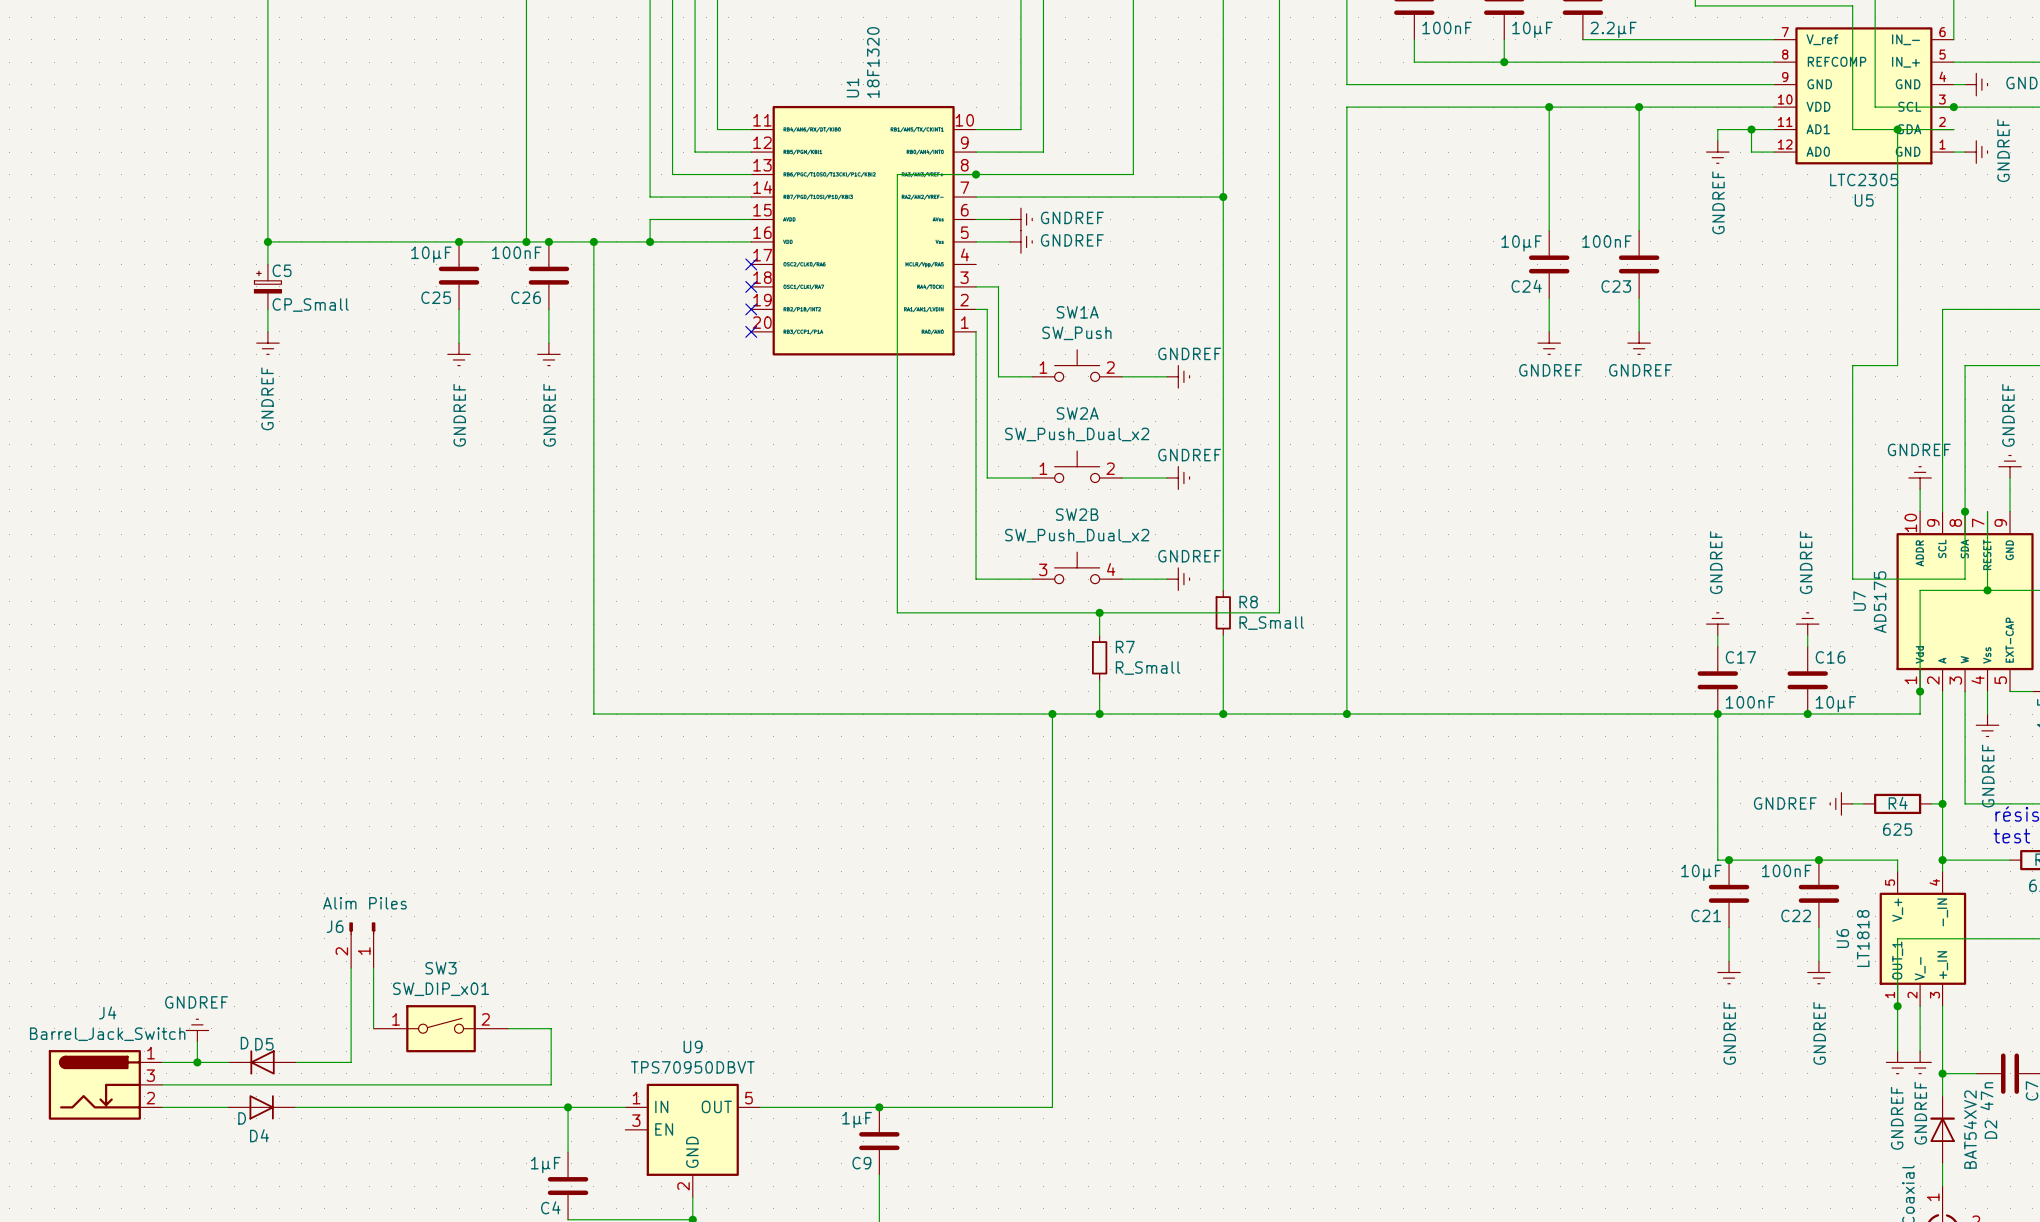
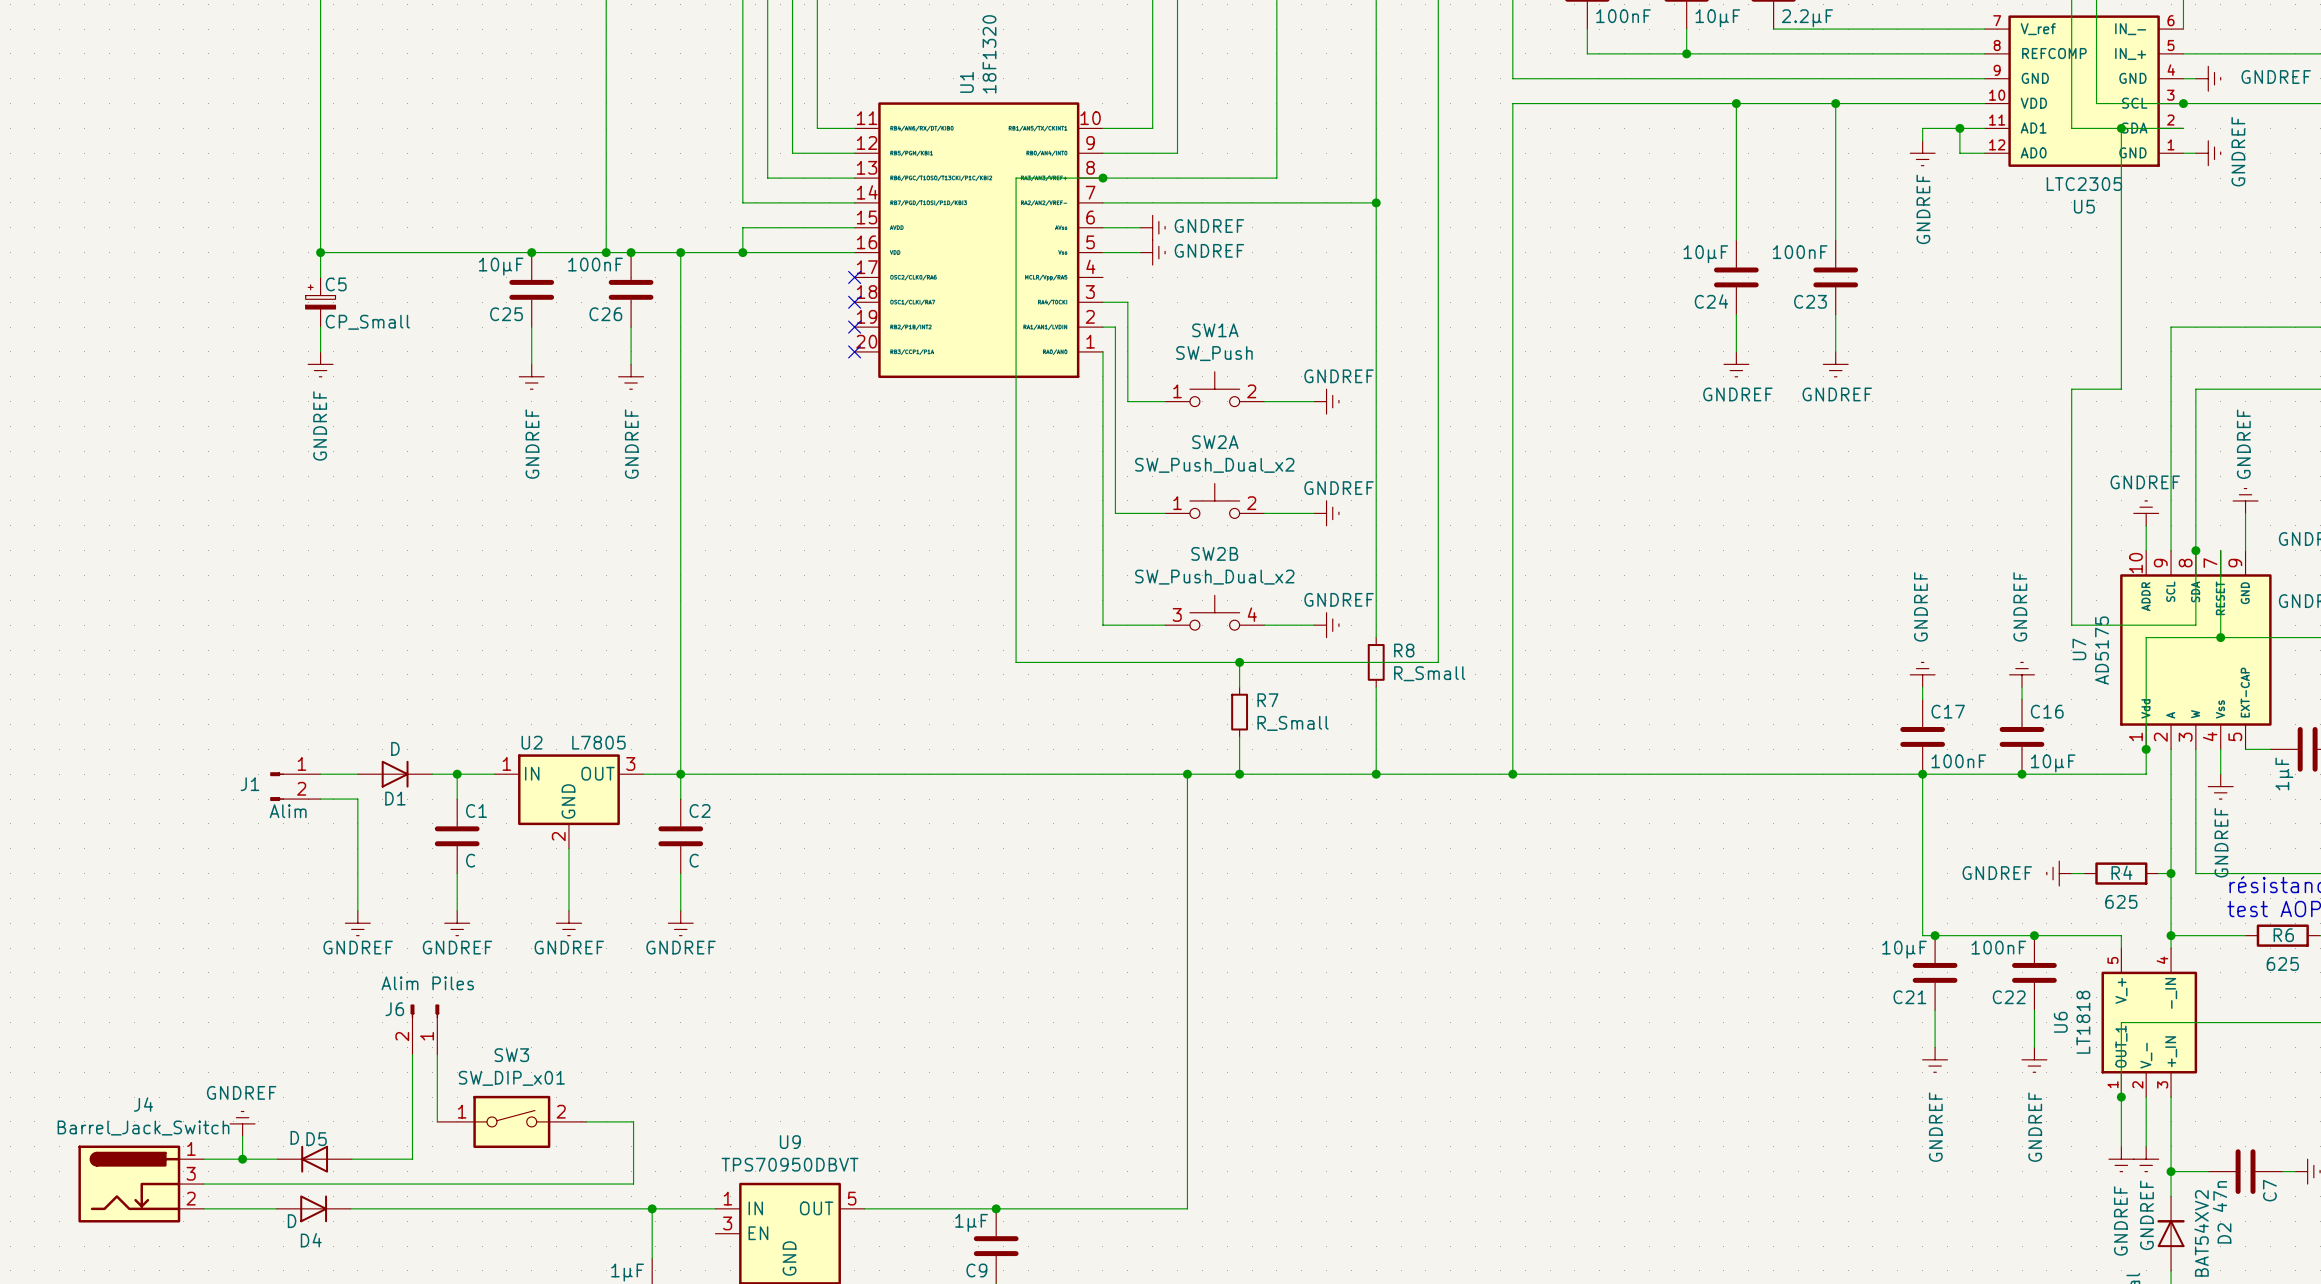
wire: none -> (320, 774) (357, 774)
D1: none -> D (395, 774)
wire: none -> (432, 774) (494, 774)
wire: none -> (457, 774) (457, 799)
junction: none -> (457, 774)
wire: none -> (643, 774) (680, 774) (680, 799)
junction: none -> (680, 774)
J1: none -> Alim (295, 786)
wire: none -> (320, 799) (357, 799) (357, 910)
U2: none -> L7805 (568, 801)
C1: none -> C (457, 836)
C2: none -> C (680, 836)
wire: none -> (568, 848) (568, 910)
wire: none -> (457, 873) (457, 910)
wire: none -> (680, 873) (680, 910)
power symbol: none -> GNDREF (357, 923)
power symbol: none -> GNDREF (457, 923)
power symbol: none -> GNDREF (568, 923)
power symbol: none -> GNDREF (680, 923)

